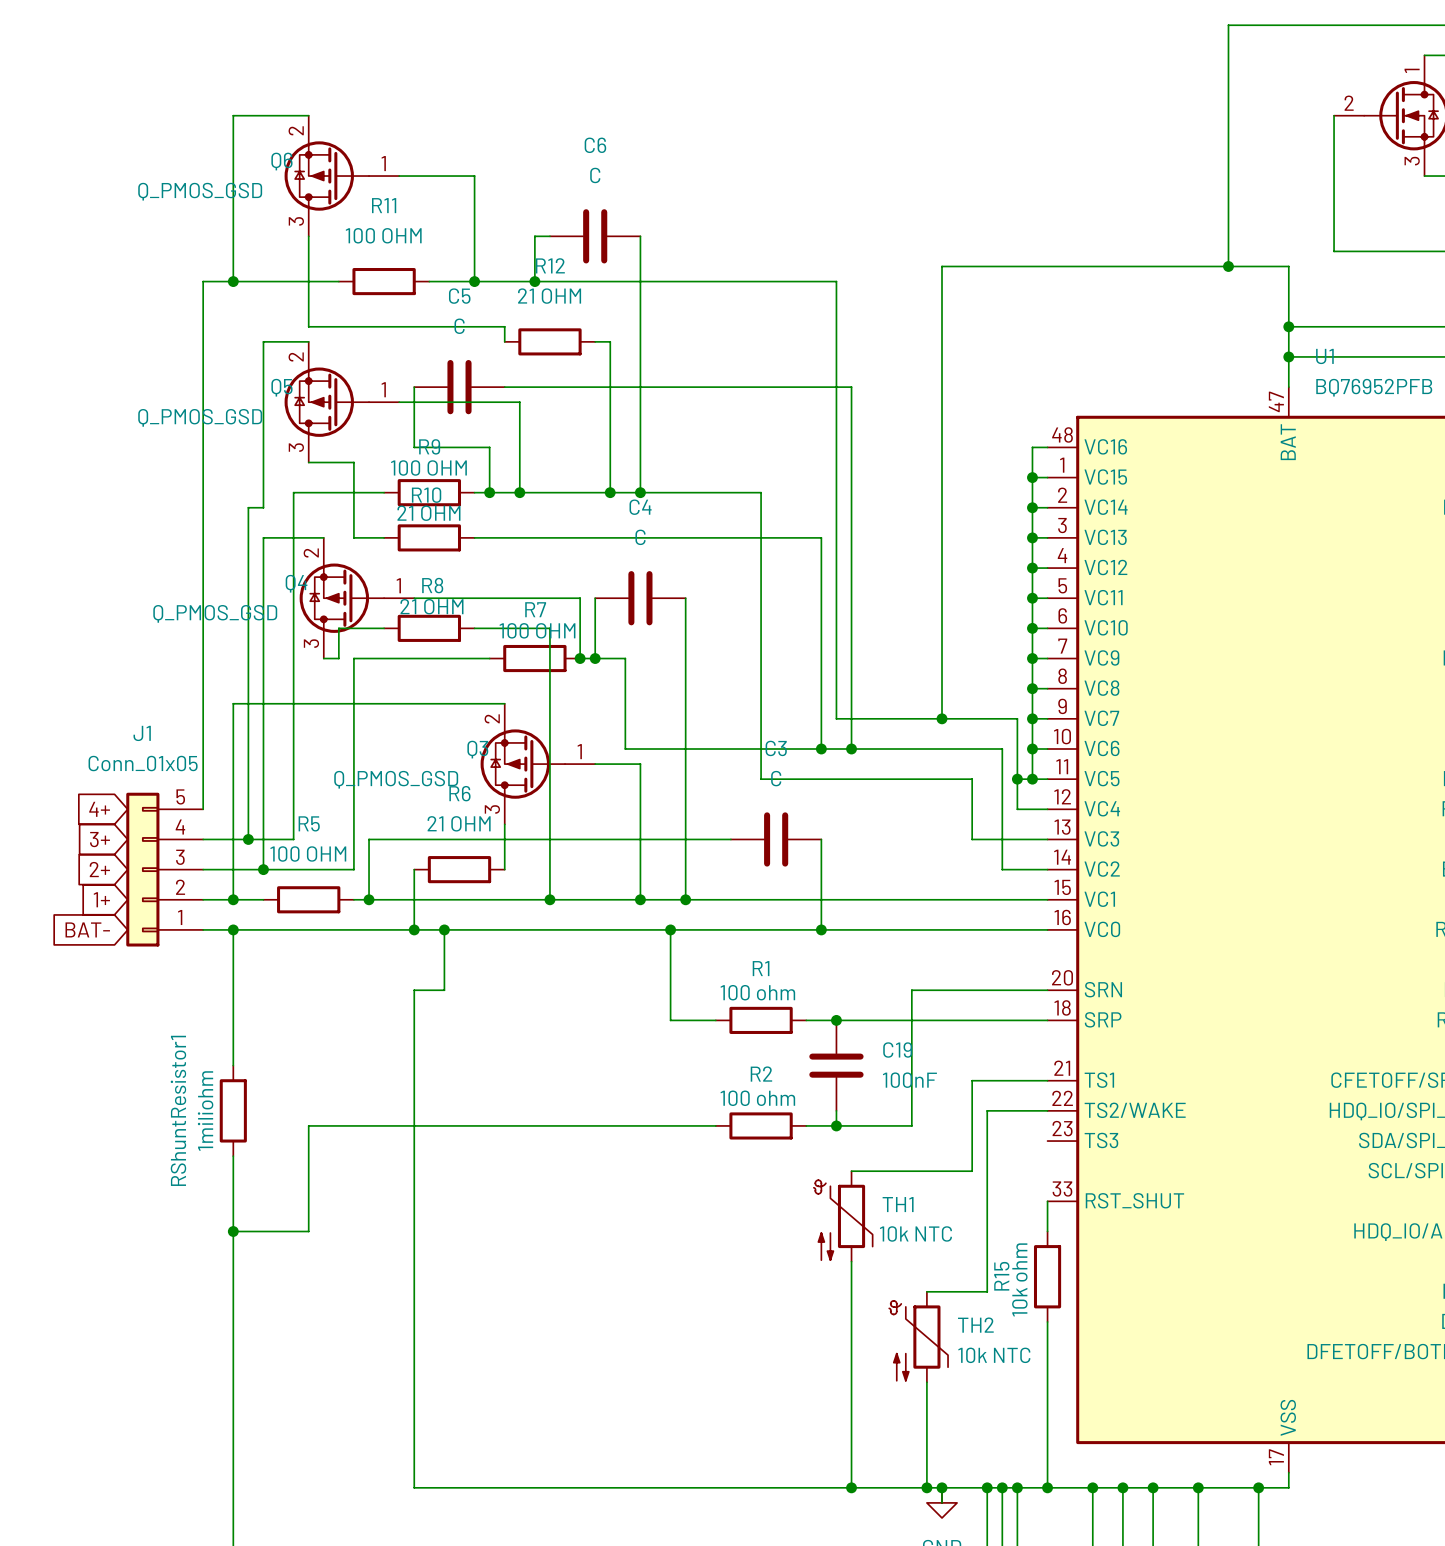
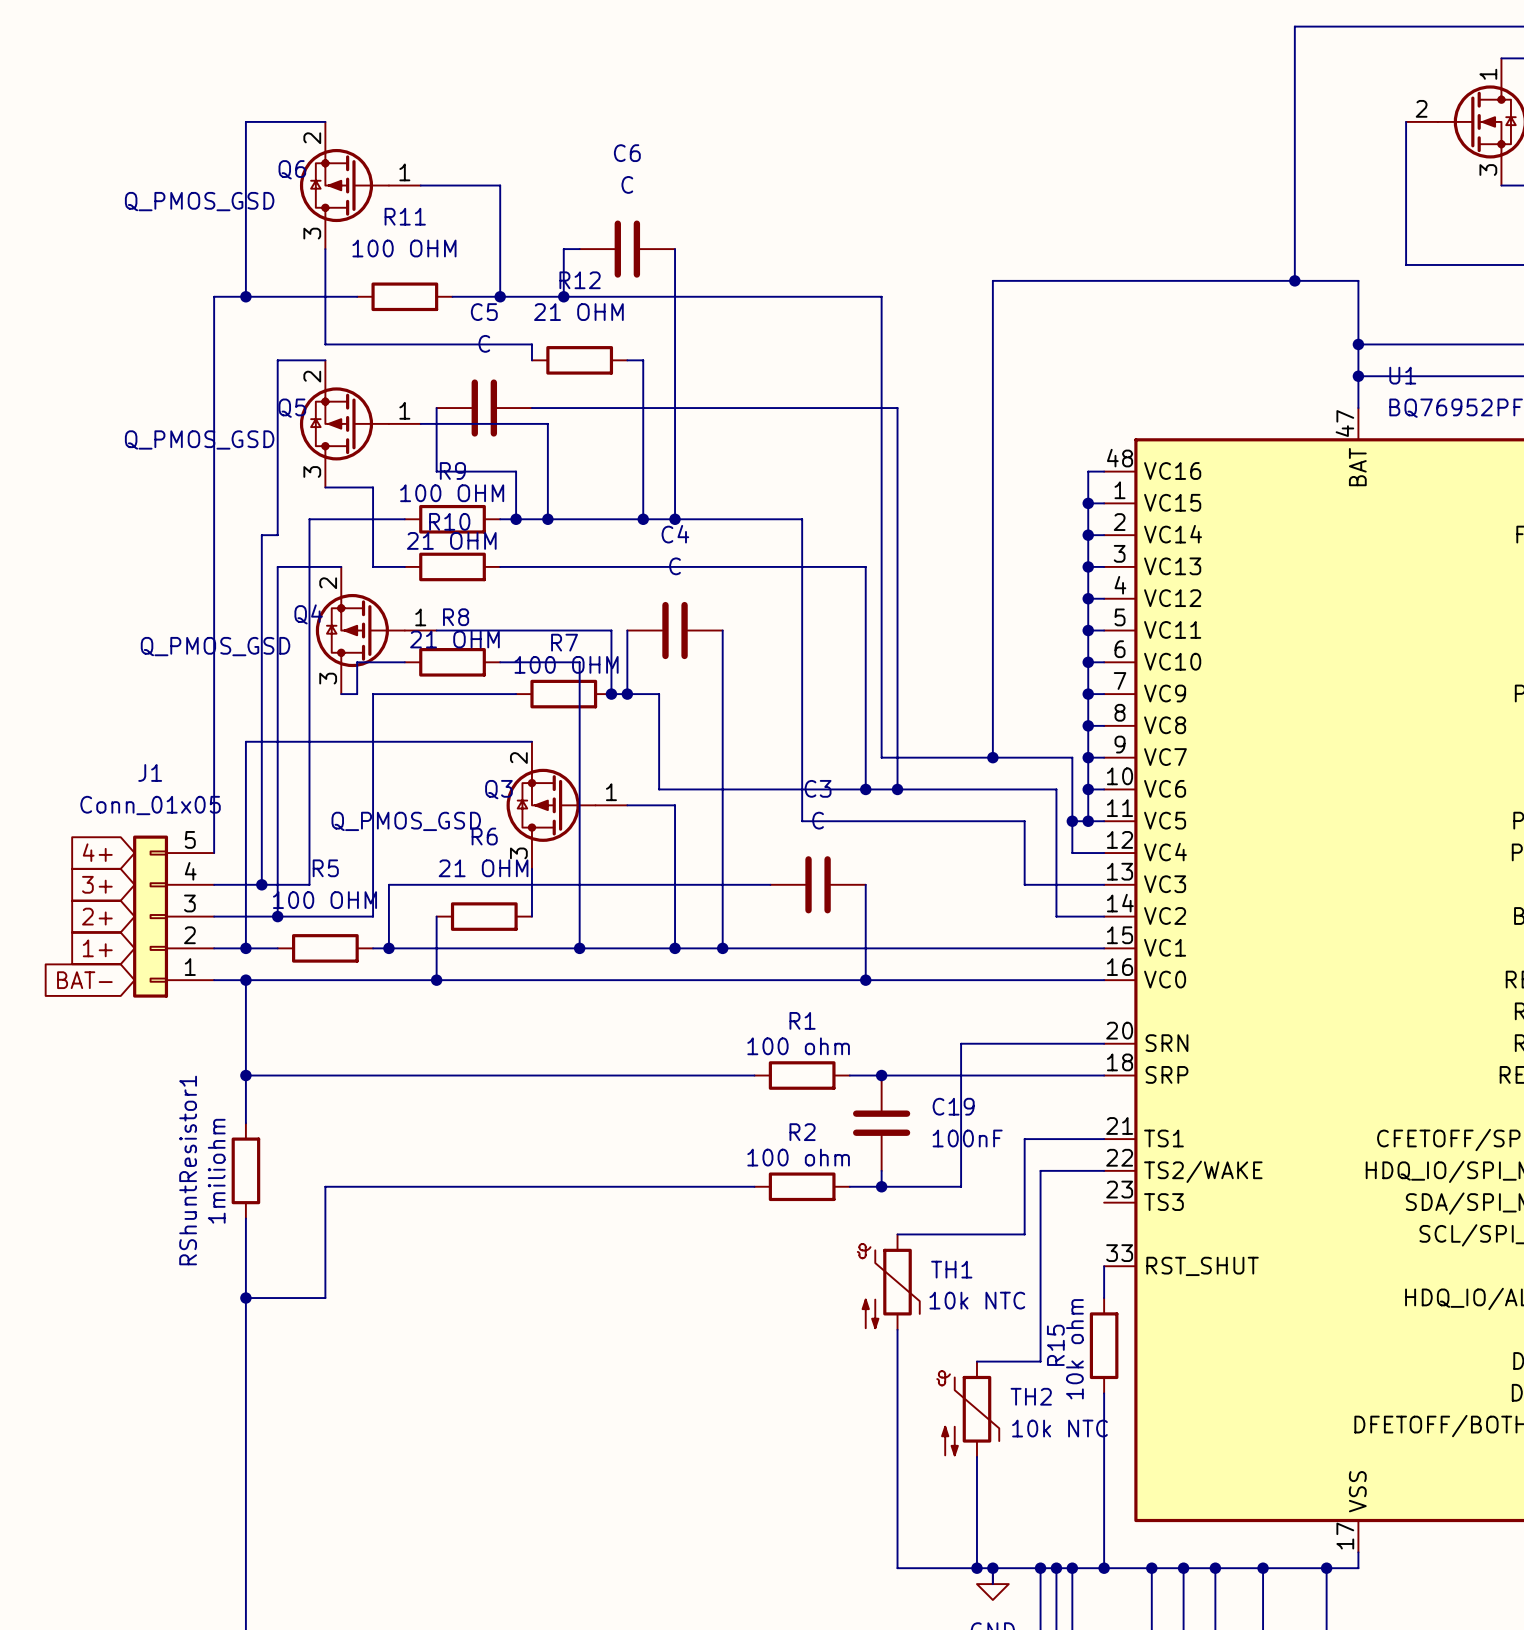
wire: (444, 929) (444, 990) (414, 990) (414, 1487) (851, 1487) -> none
junction: (444, 929) -> none
wire: (670, 929) (670, 1020) -> (245, 1075) (706, 1075)
junction: (670, 929) -> none
junction: none -> (245, 1075)
junction: (851, 1487) -> none

